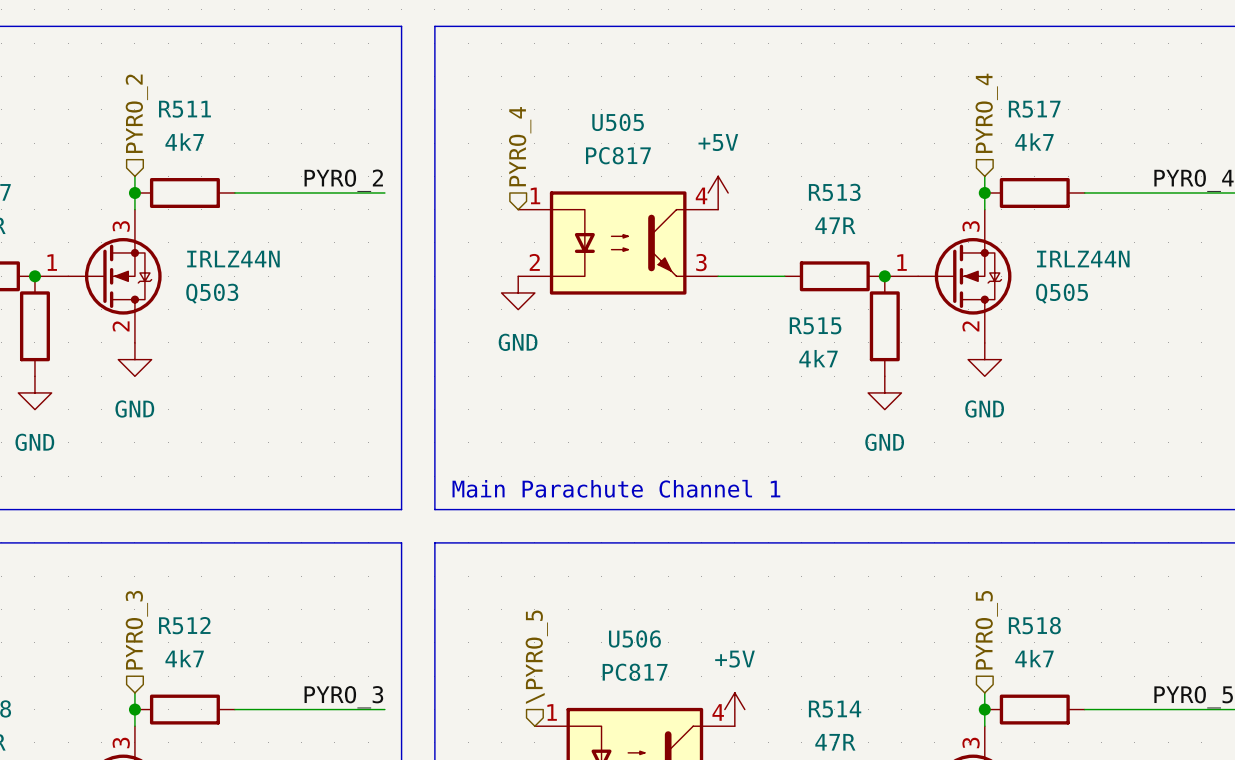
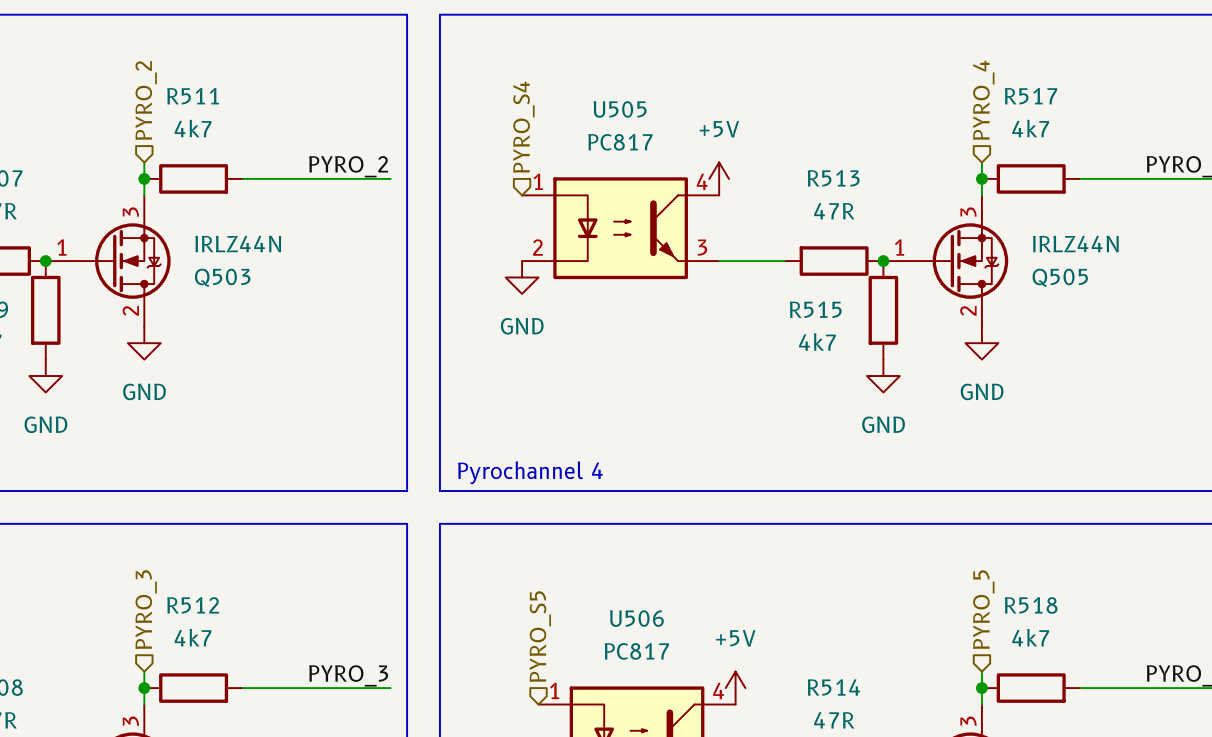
hierarchical label: PYRO_4 (520, 146) -> PYRO_S4 (523, 127)
text: Main Parachute Channel 1 (616, 488) -> Pyrochannel 4 (530, 472)
hierarchical label: \PYRO_5 (536, 657) -> PYRO_S5 (540, 636)

